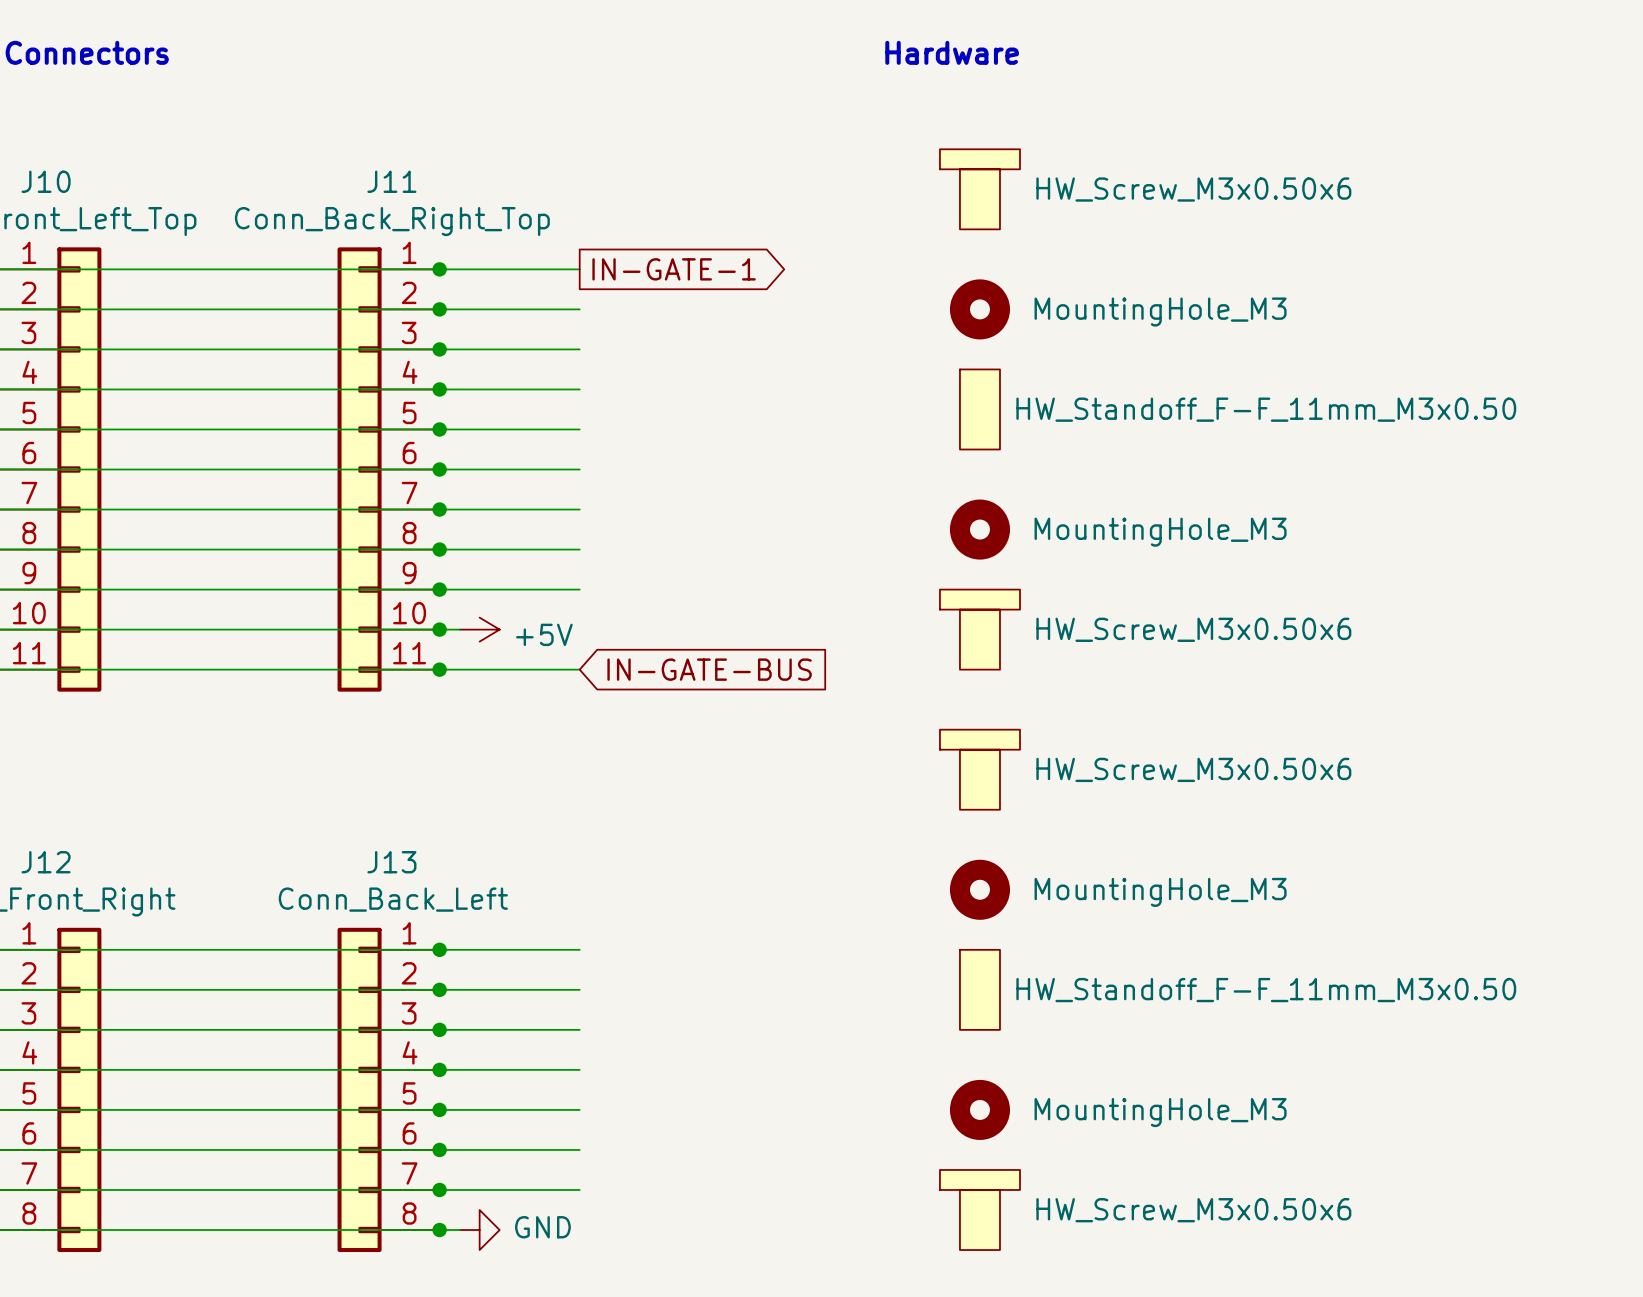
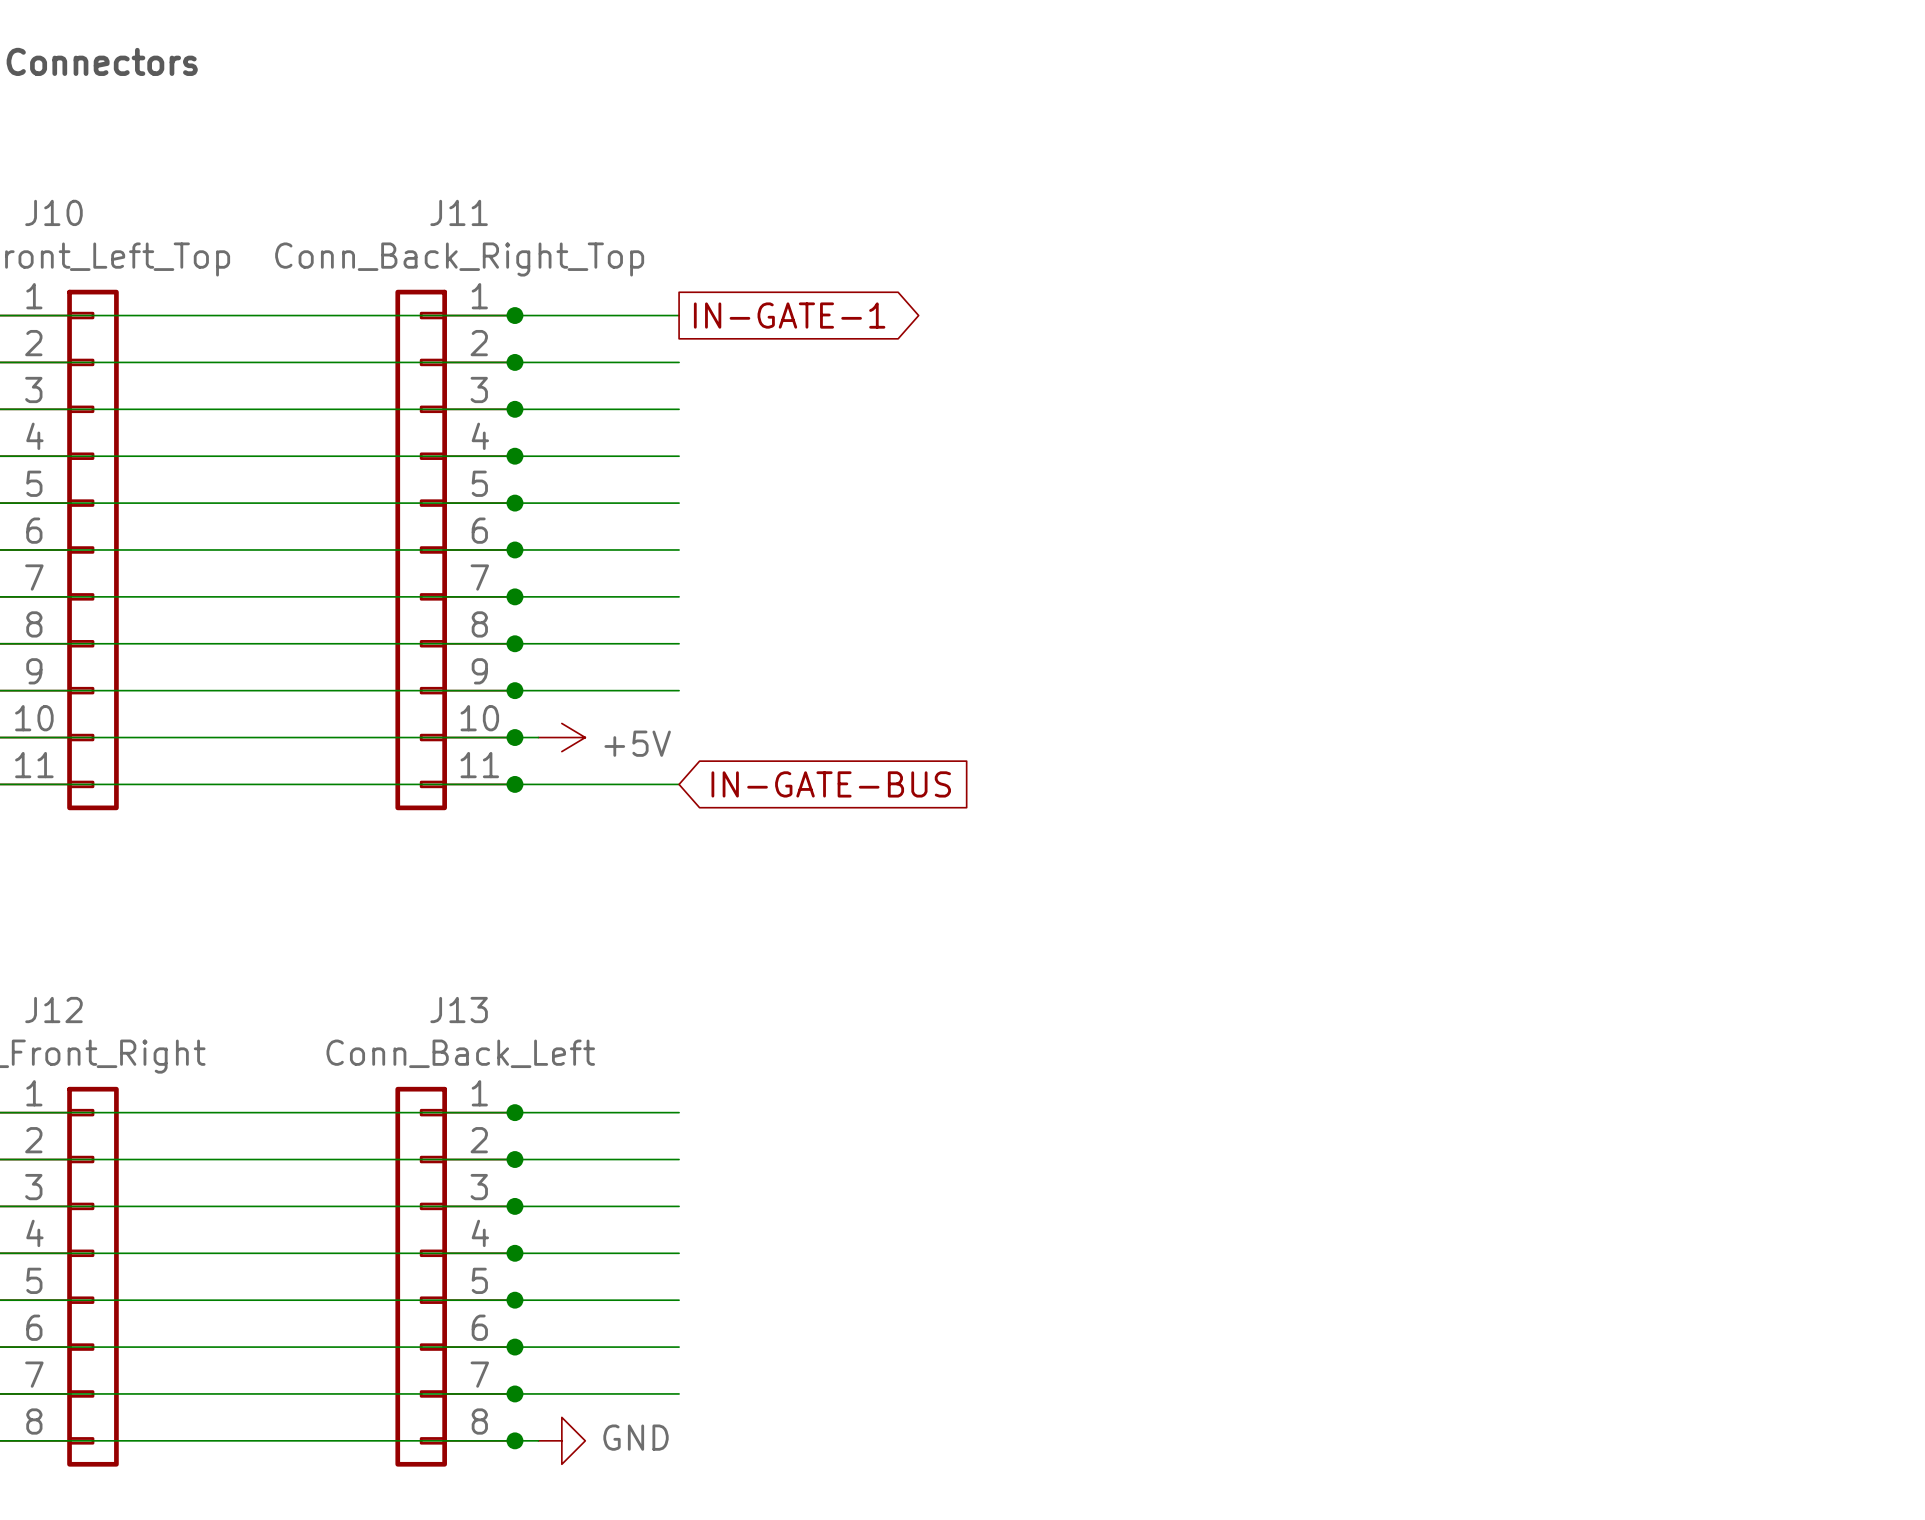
text: Hardware (952, 52) -> none
part: HW_Screw_M3x0.50x6 (979, 189) -> none
part: MountingHole_M3 (979, 309) -> none
part: HW_Standoff_F-F_11mm_M3x0.50 (979, 409) -> none
part: MountingHole_M3 (979, 529) -> none
part: HW_Screw_M3x0.50x6 (979, 629) -> none
part: HW_Screw_M3x0.50x6 (979, 769) -> none
part: MountingHole_M3 (979, 889) -> none
part: HW_Standoff_F-F_11mm_M3x0.50 (979, 989) -> none
part: MountingHole_M3 (979, 1109) -> none
part: HW_Screw_M3x0.50x6 (979, 1210) -> none

